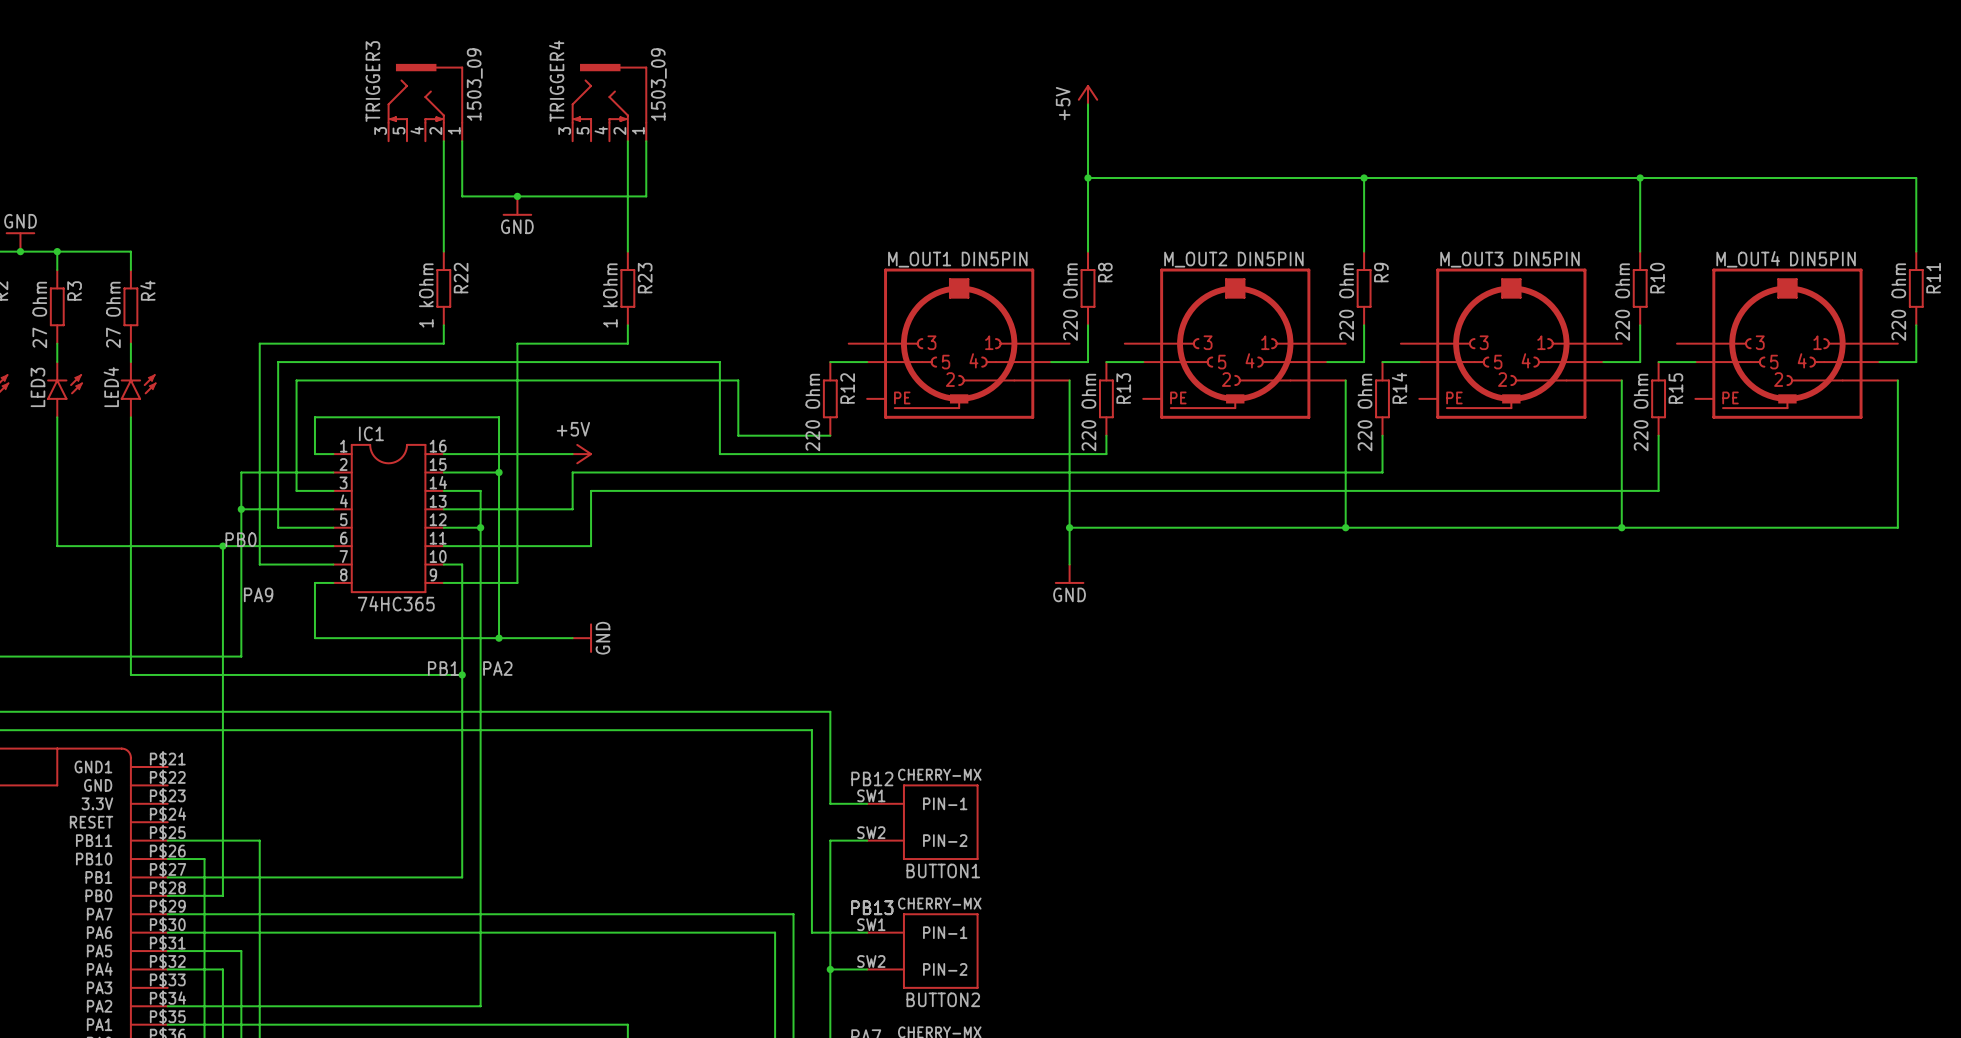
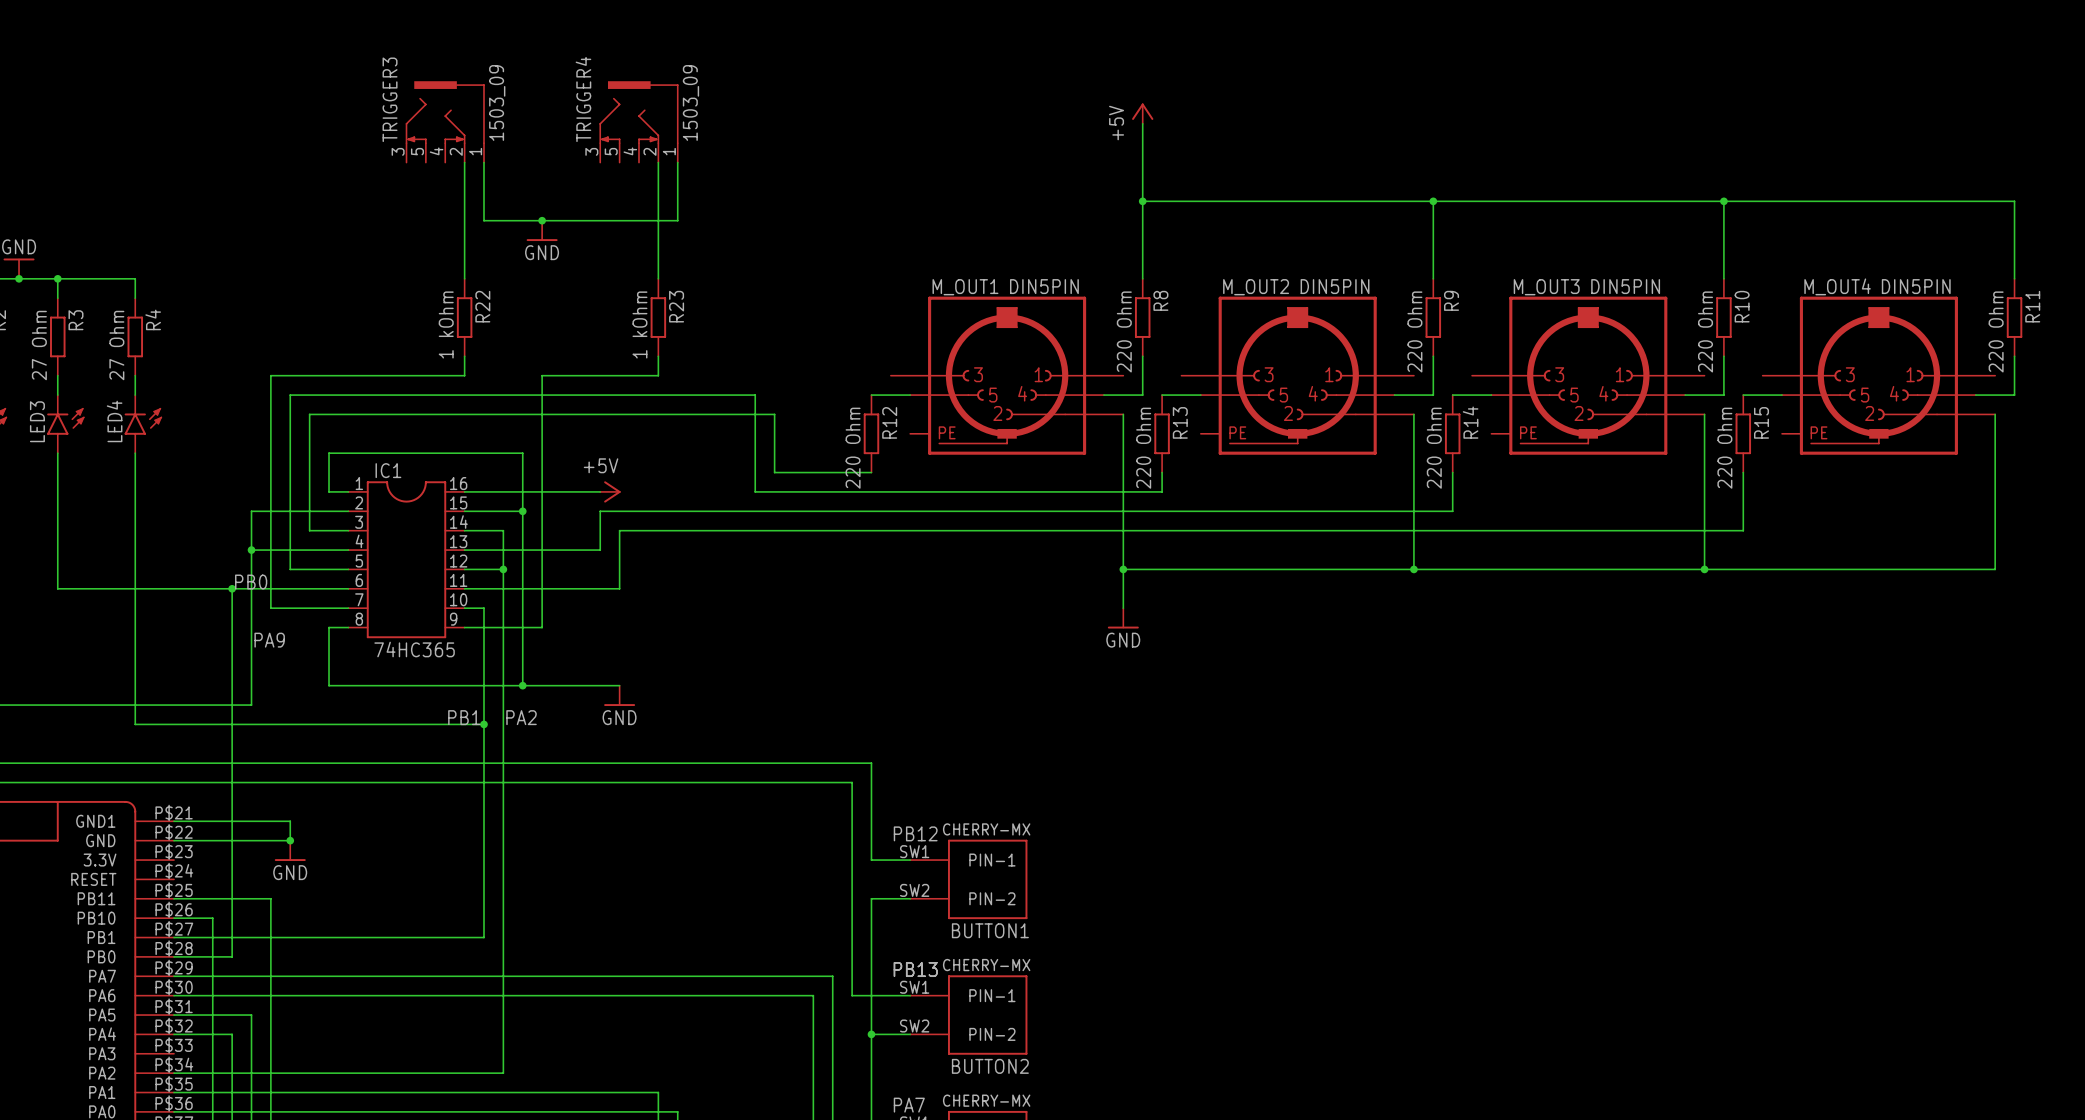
power symbol rotation: 0° (591, 638) -> 90° clockwise (619, 705)
wire: none -> (174, 821) (290, 821) (290, 840) (174, 840)
junction: none -> (290, 840)
power symbol: none -> GND (290, 850)

